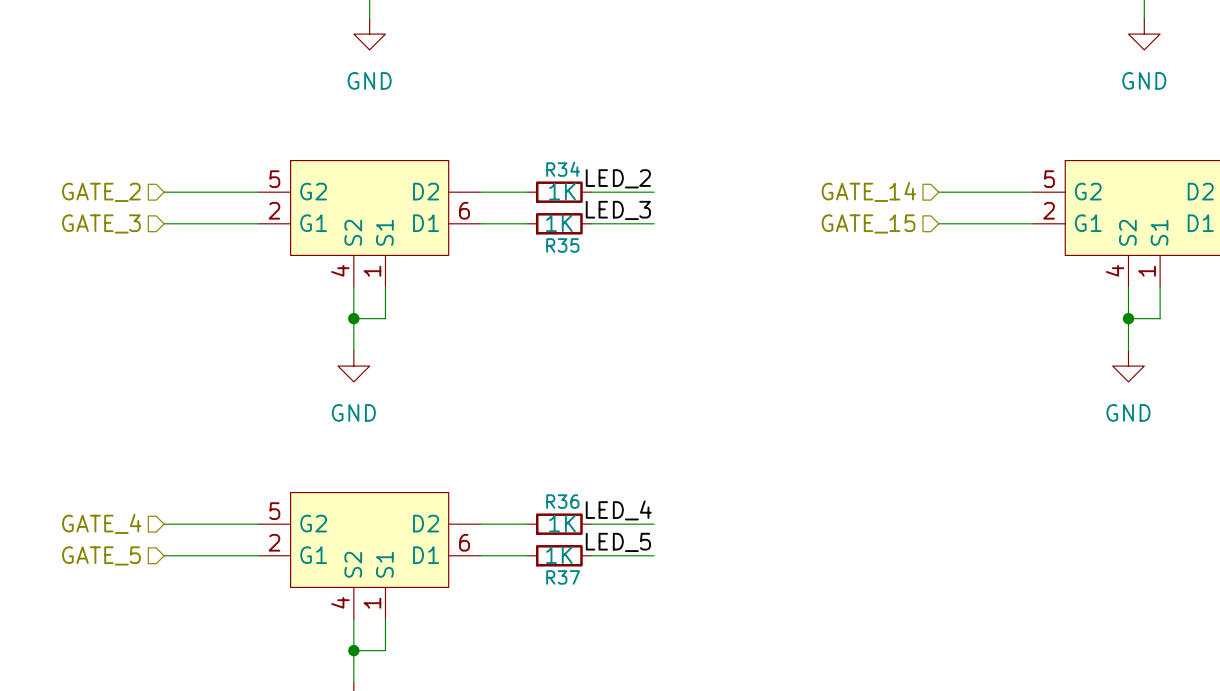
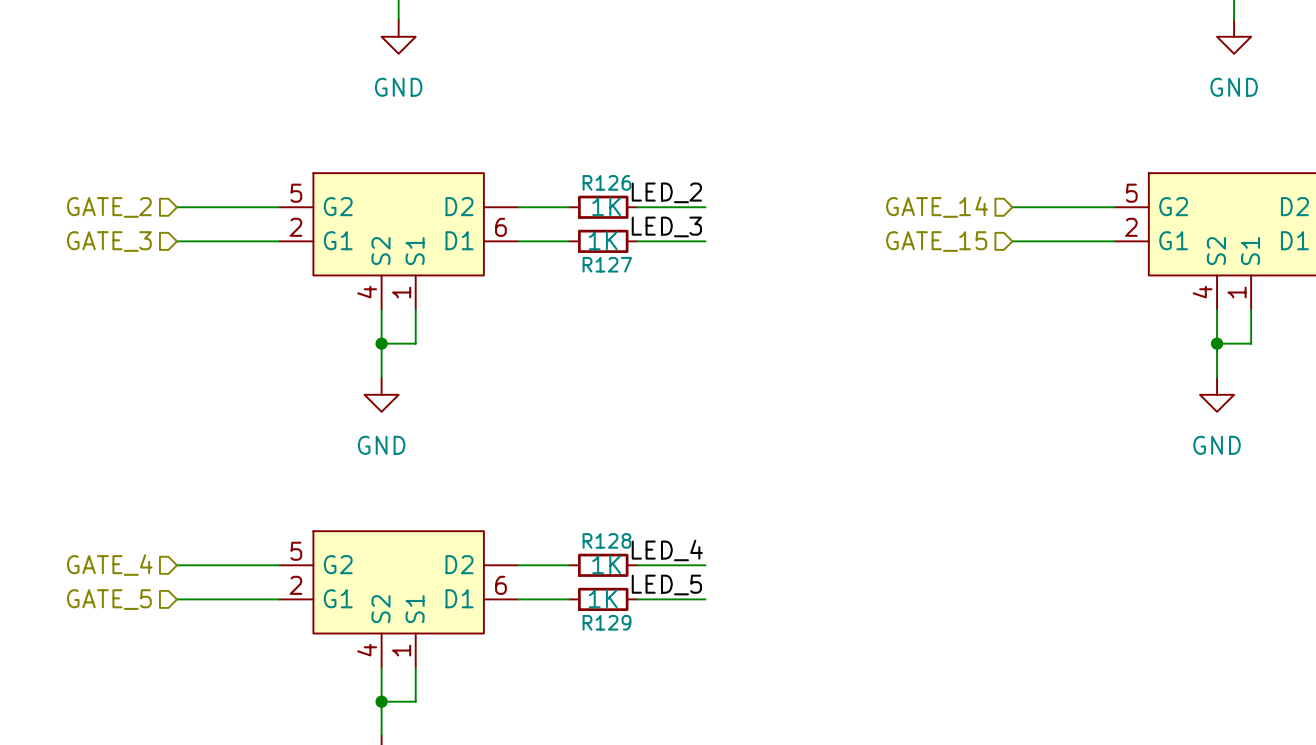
R34 name: R34 (563, 169) -> R126 (606, 182)
R35 name: R35 (562, 245) -> R127 (607, 264)
R36 name: R36 (562, 501) -> R128 (606, 540)
R37 name: R37 (563, 577) -> R129 (606, 622)

